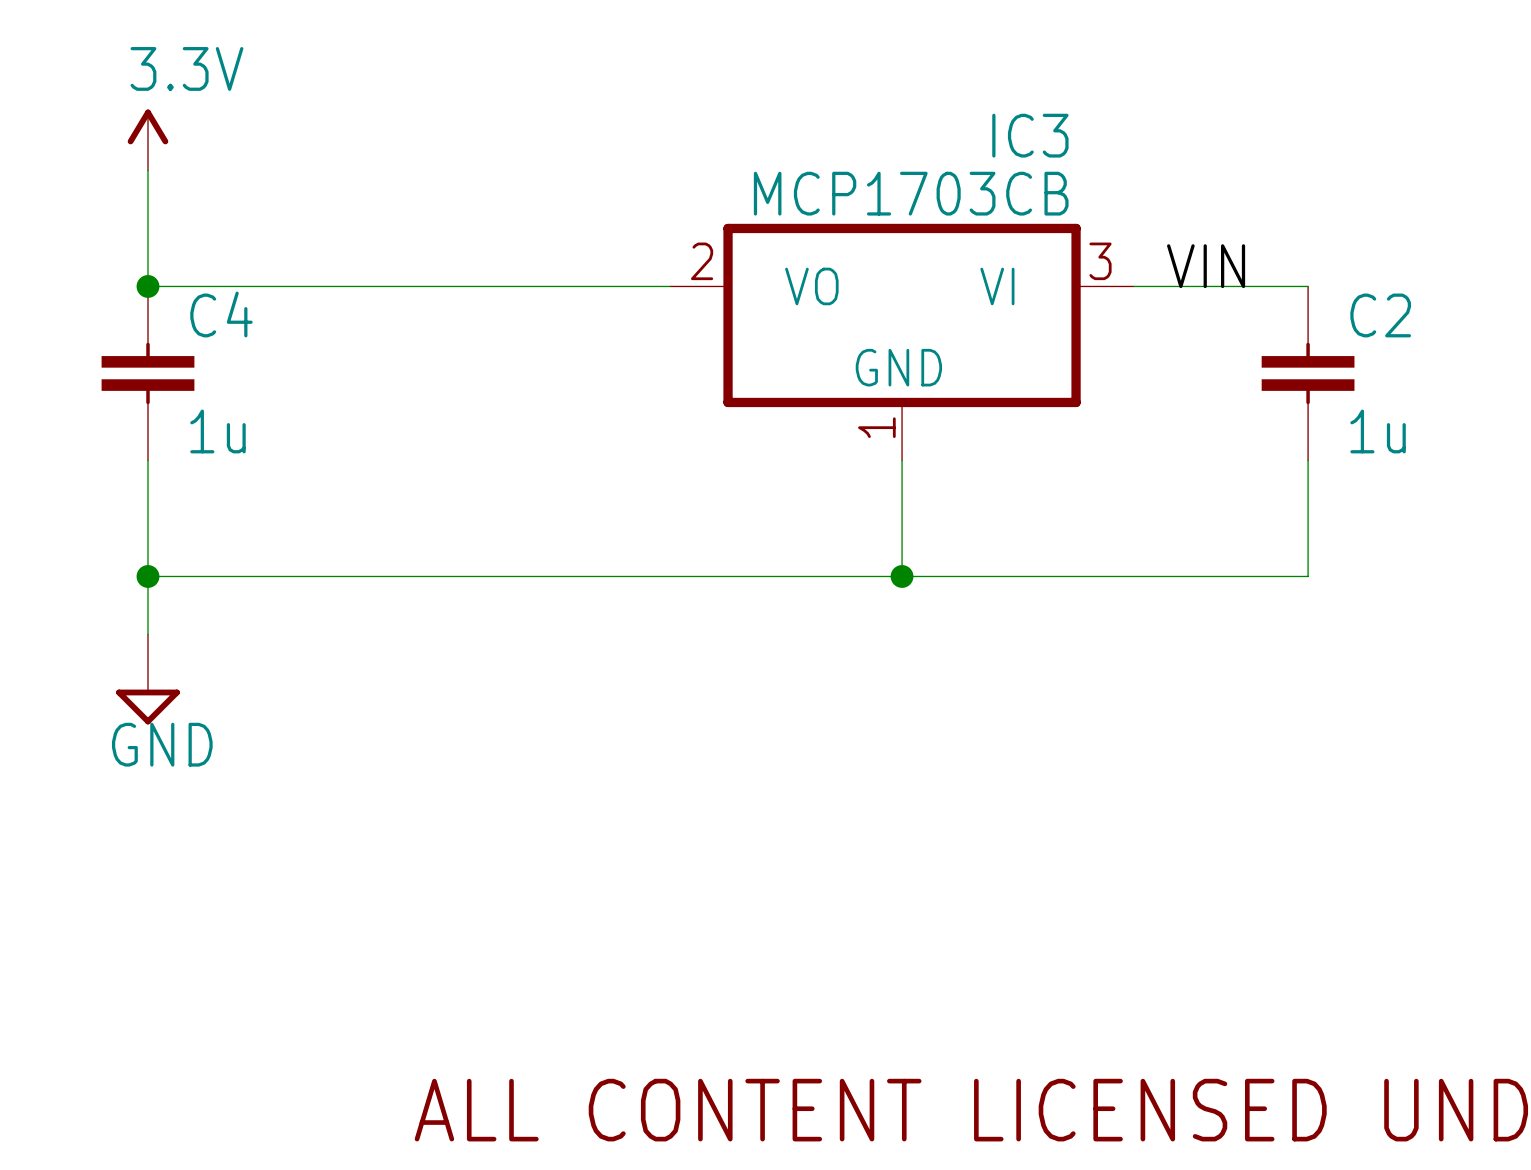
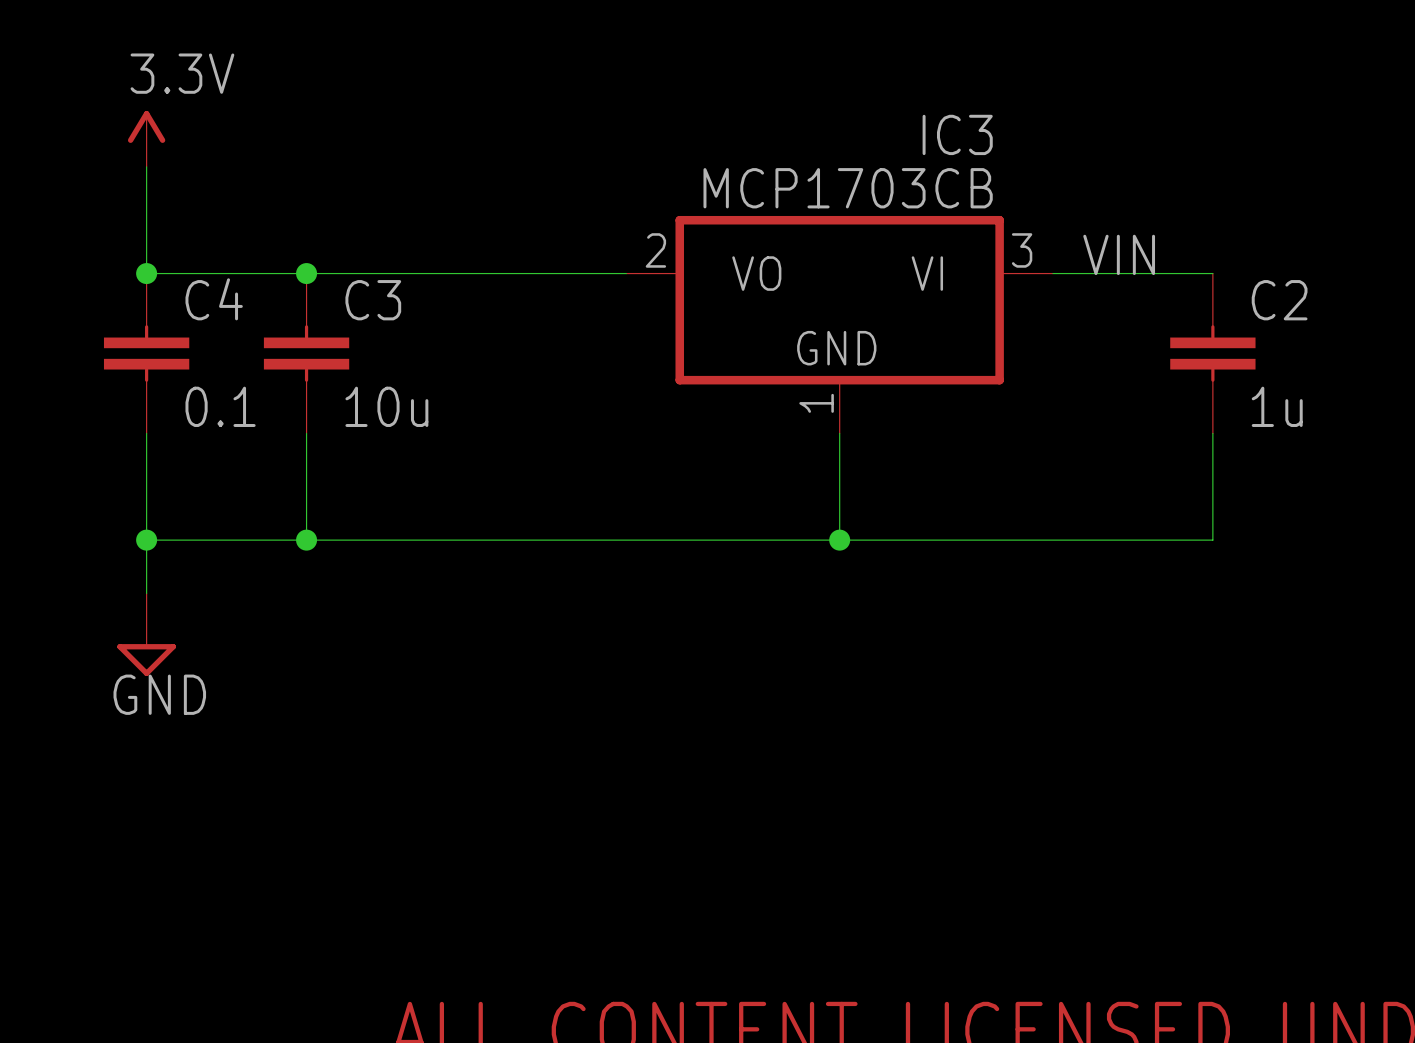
junction: none -> (306, 273)
C3: none -> 10u (306, 353)
C4 value: 1u (217, 431) -> 0.1 (220, 406)
wire: none -> (306, 433) (306, 540)
junction: none -> (306, 540)

